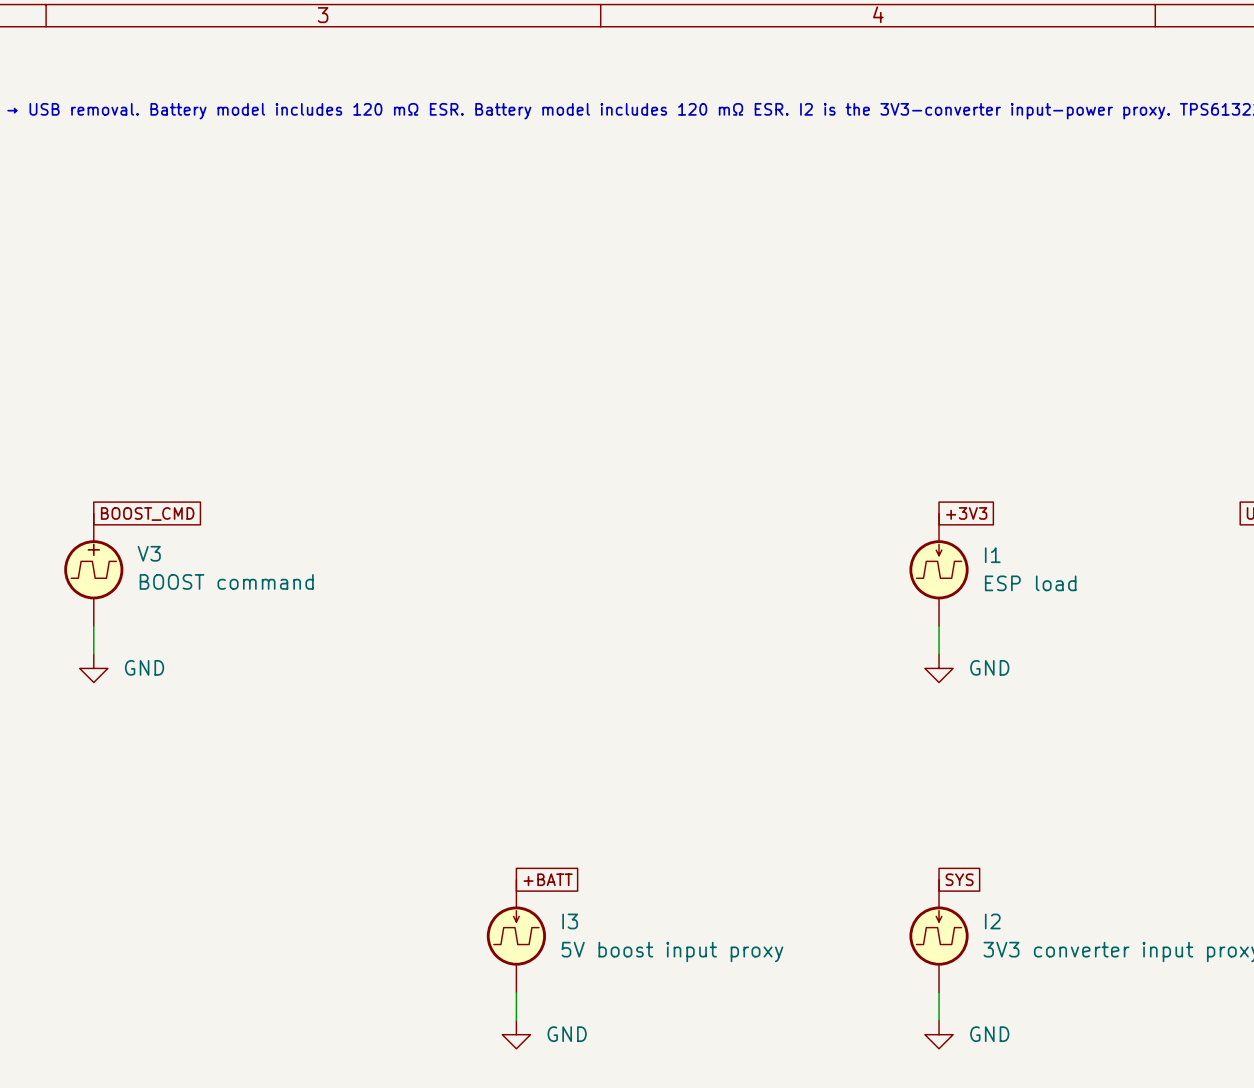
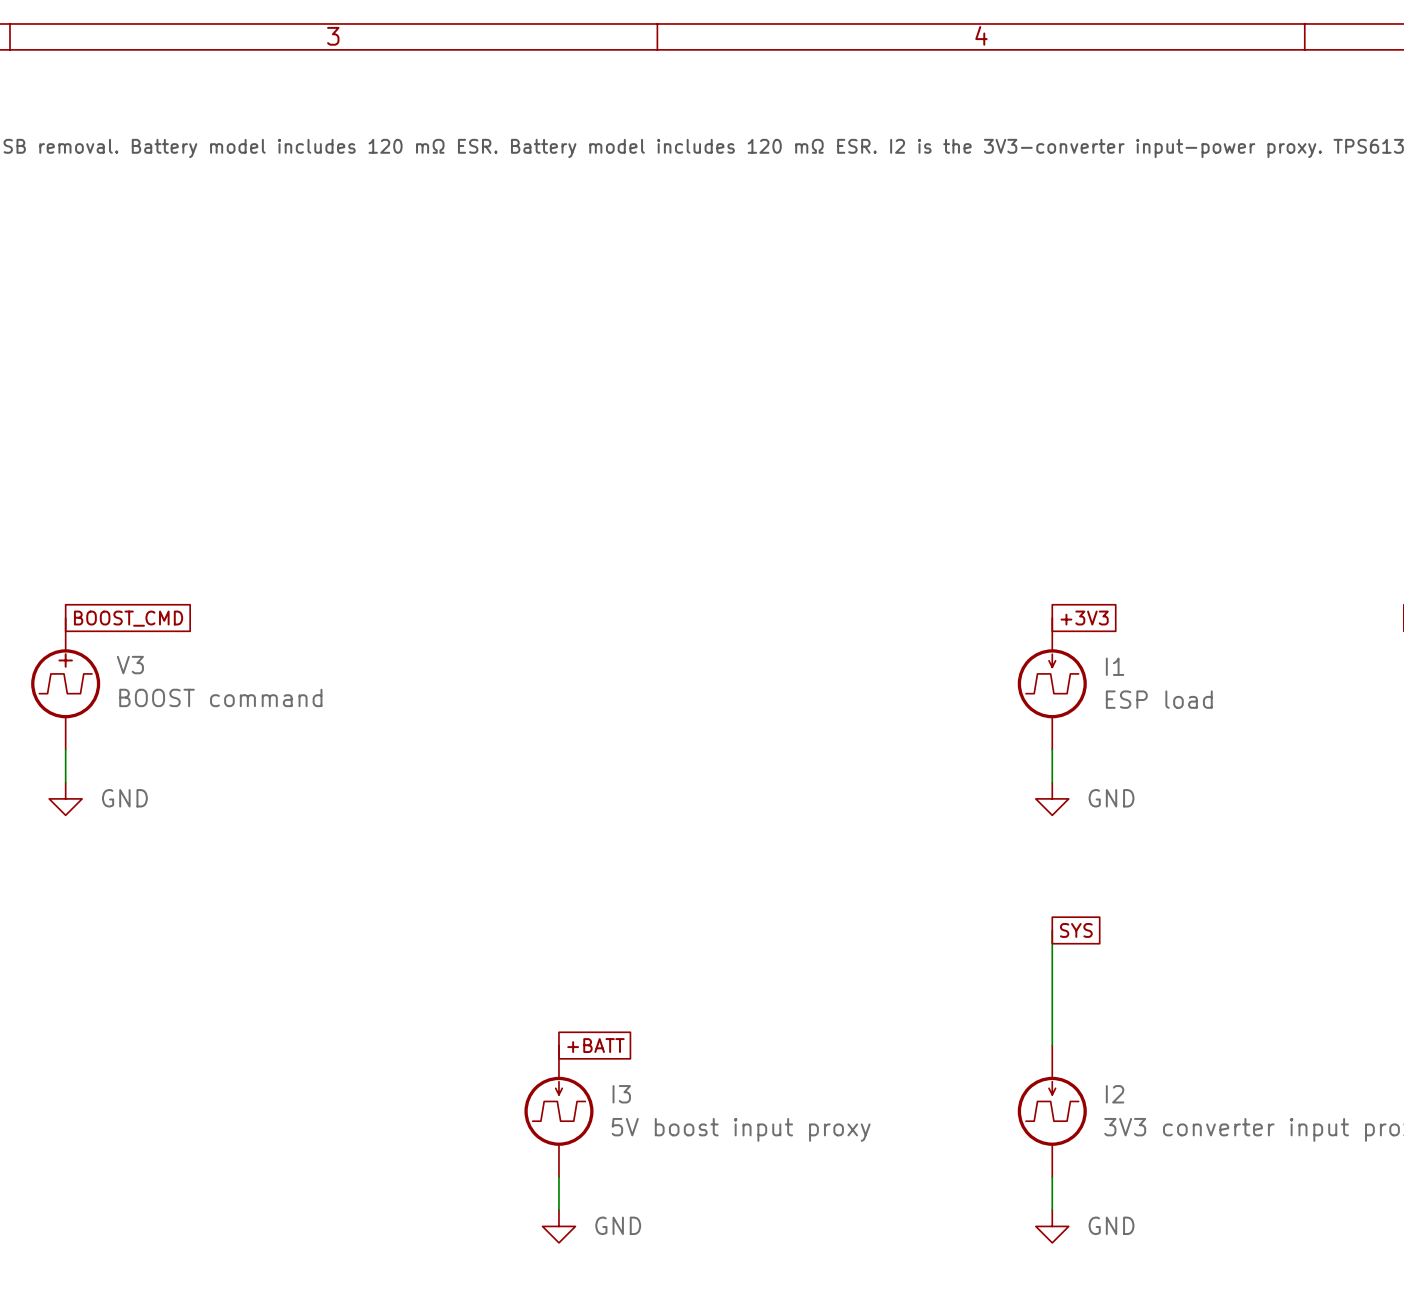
wire: none -> (1052, 930) (1052, 1045)
global label position: SYS (959, 879) -> SYS (1076, 930)

